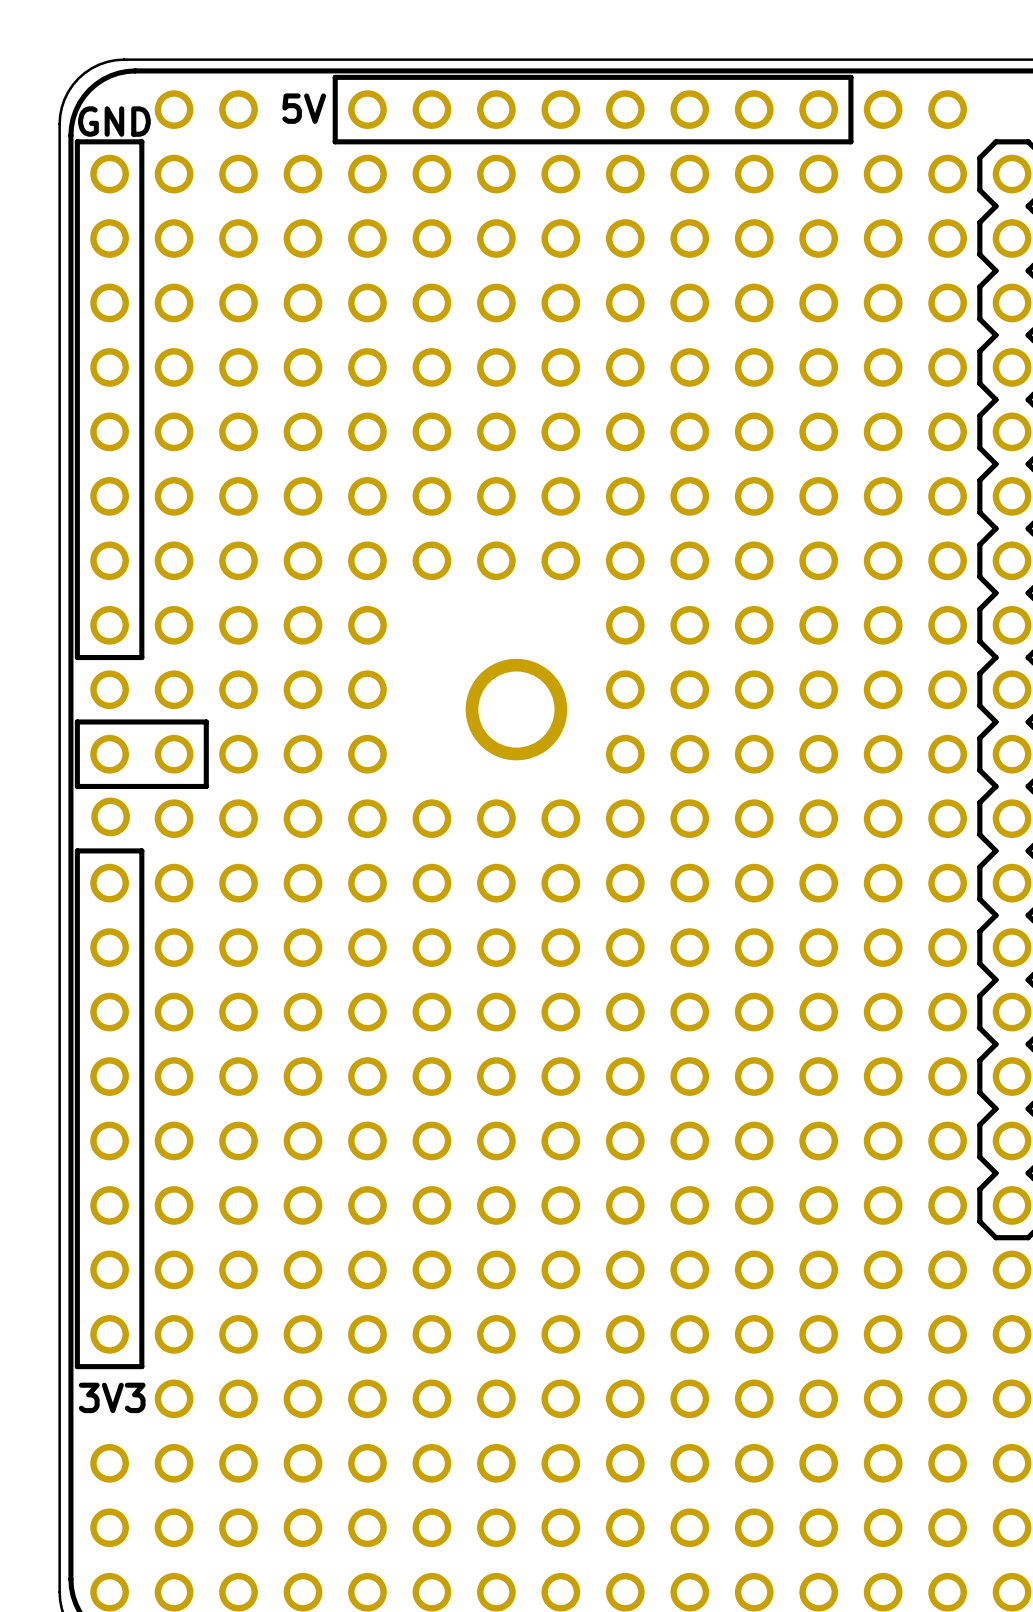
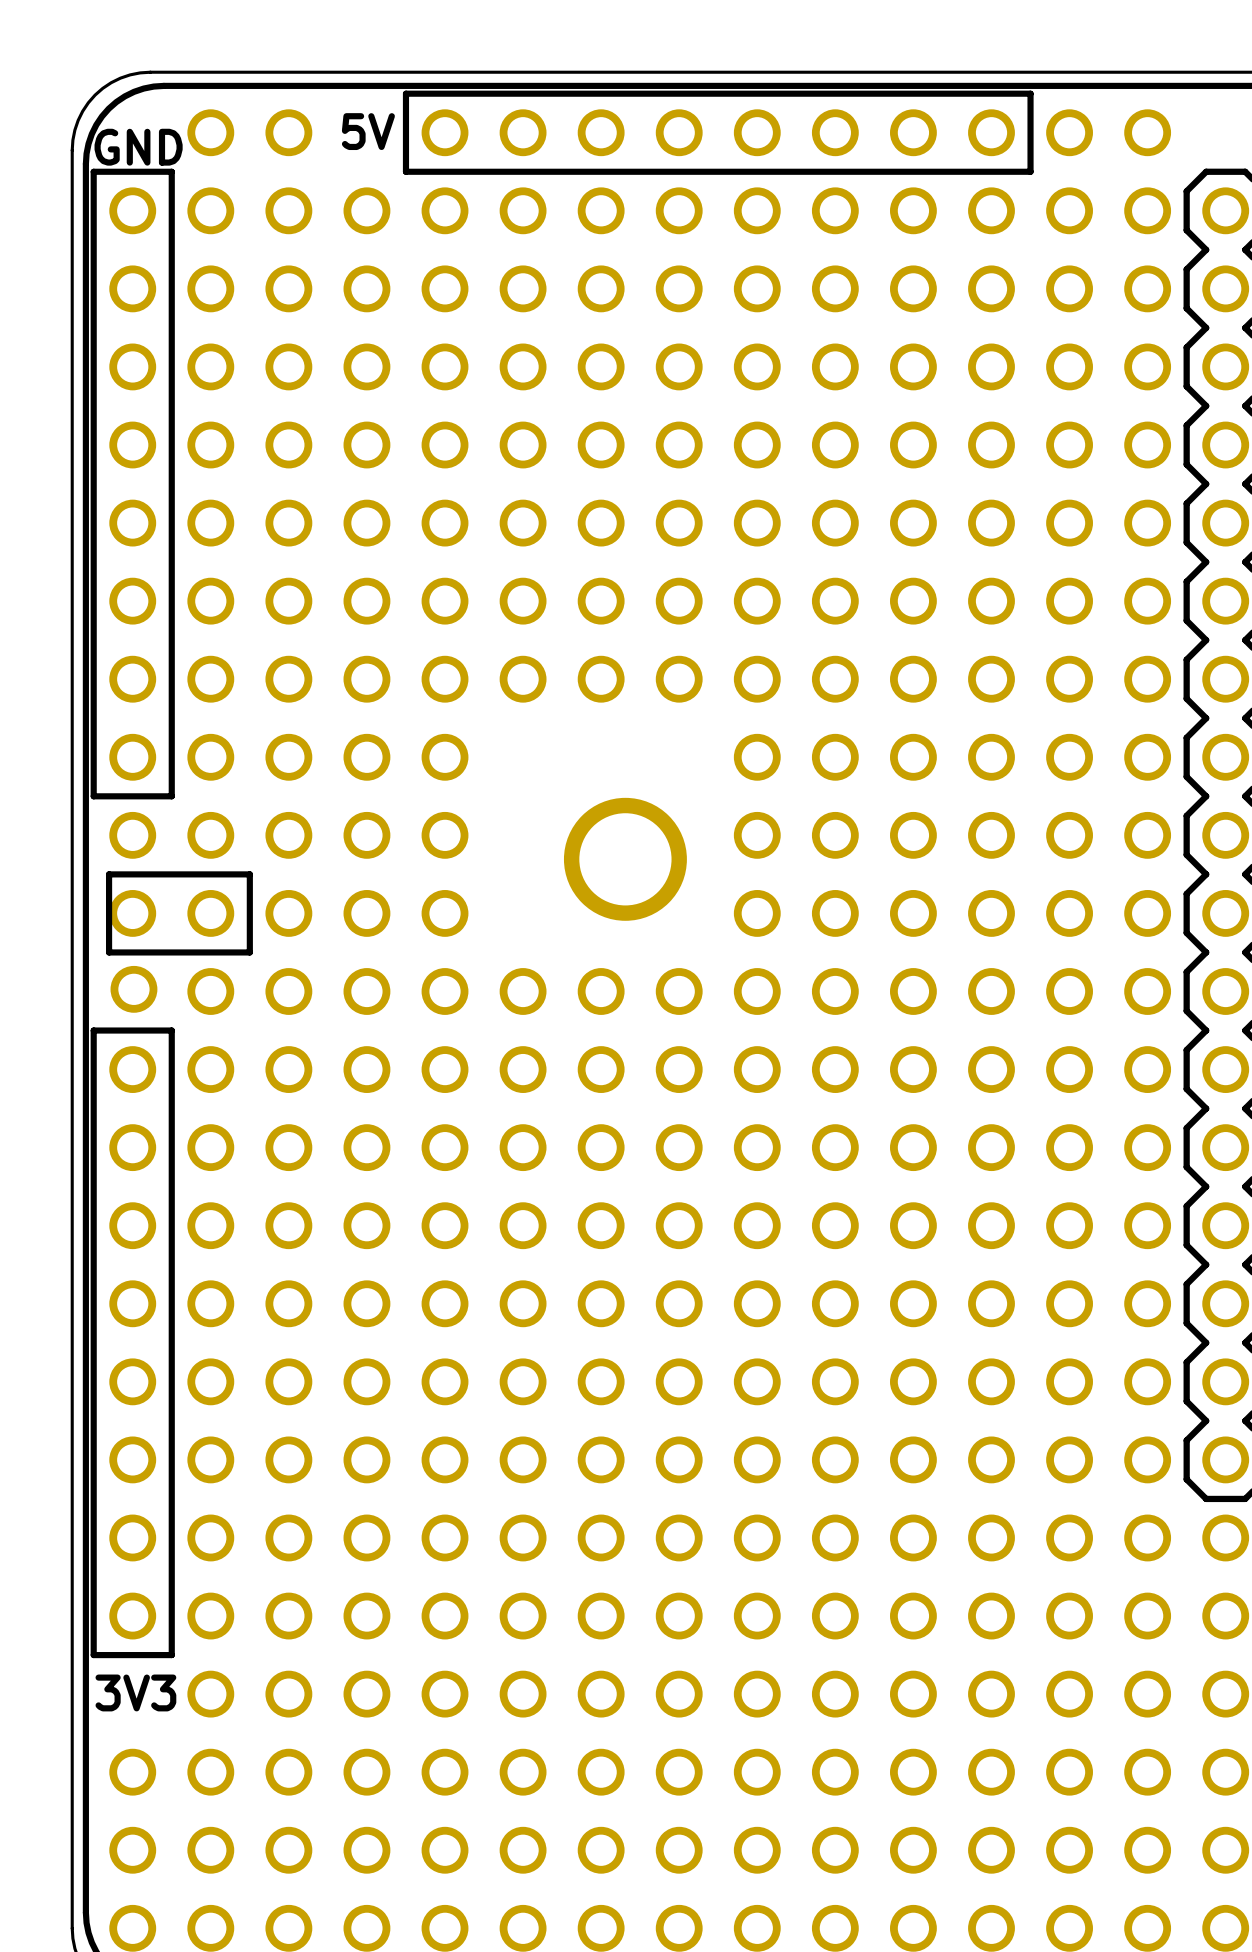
line: (90, 721) (77, 721) (77, 786) (90, 786) -> (109, 874) (109, 952)

